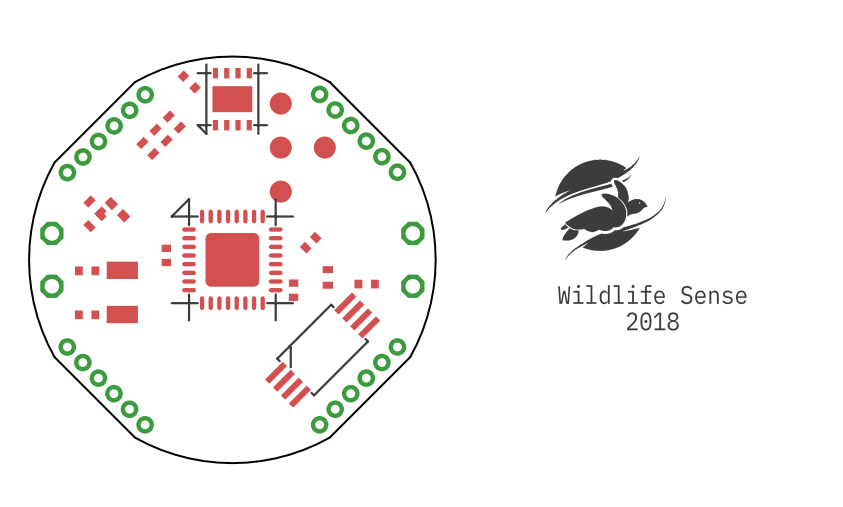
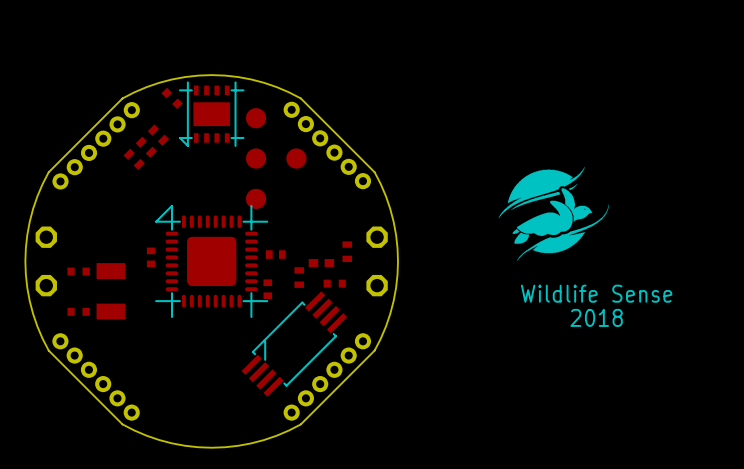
part: (95, 207) -> none
part: (117, 209) -> none
part: (95, 220) -> none
part rotation: 0° (310, 242) -> 45° clockwise (275, 254)
part: none -> (347, 251)
part: none -> (321, 263)

